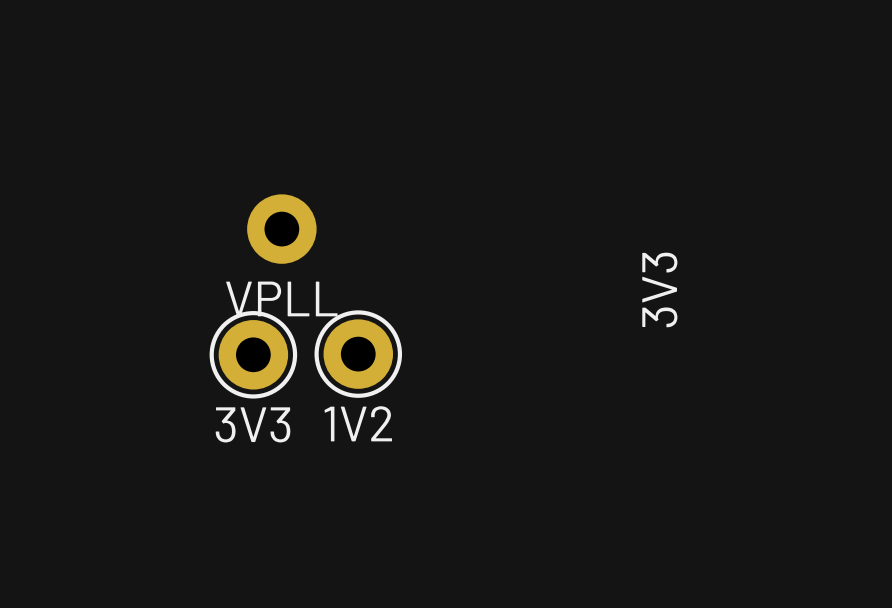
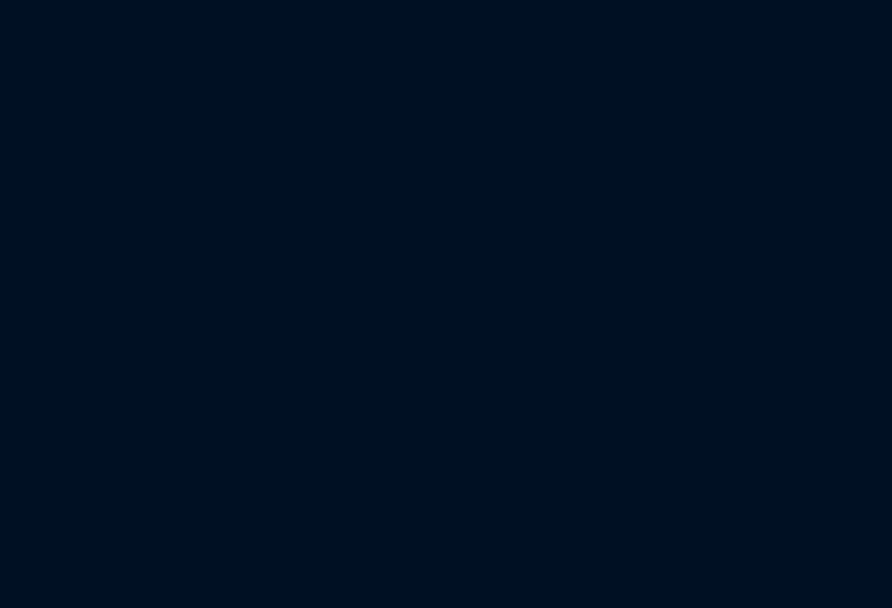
part: VPLL (281, 229) -> none
text: 3V3 (659, 290) -> none
part: 3V3 (253, 354) -> none
part: 1V2 (358, 354) -> none

